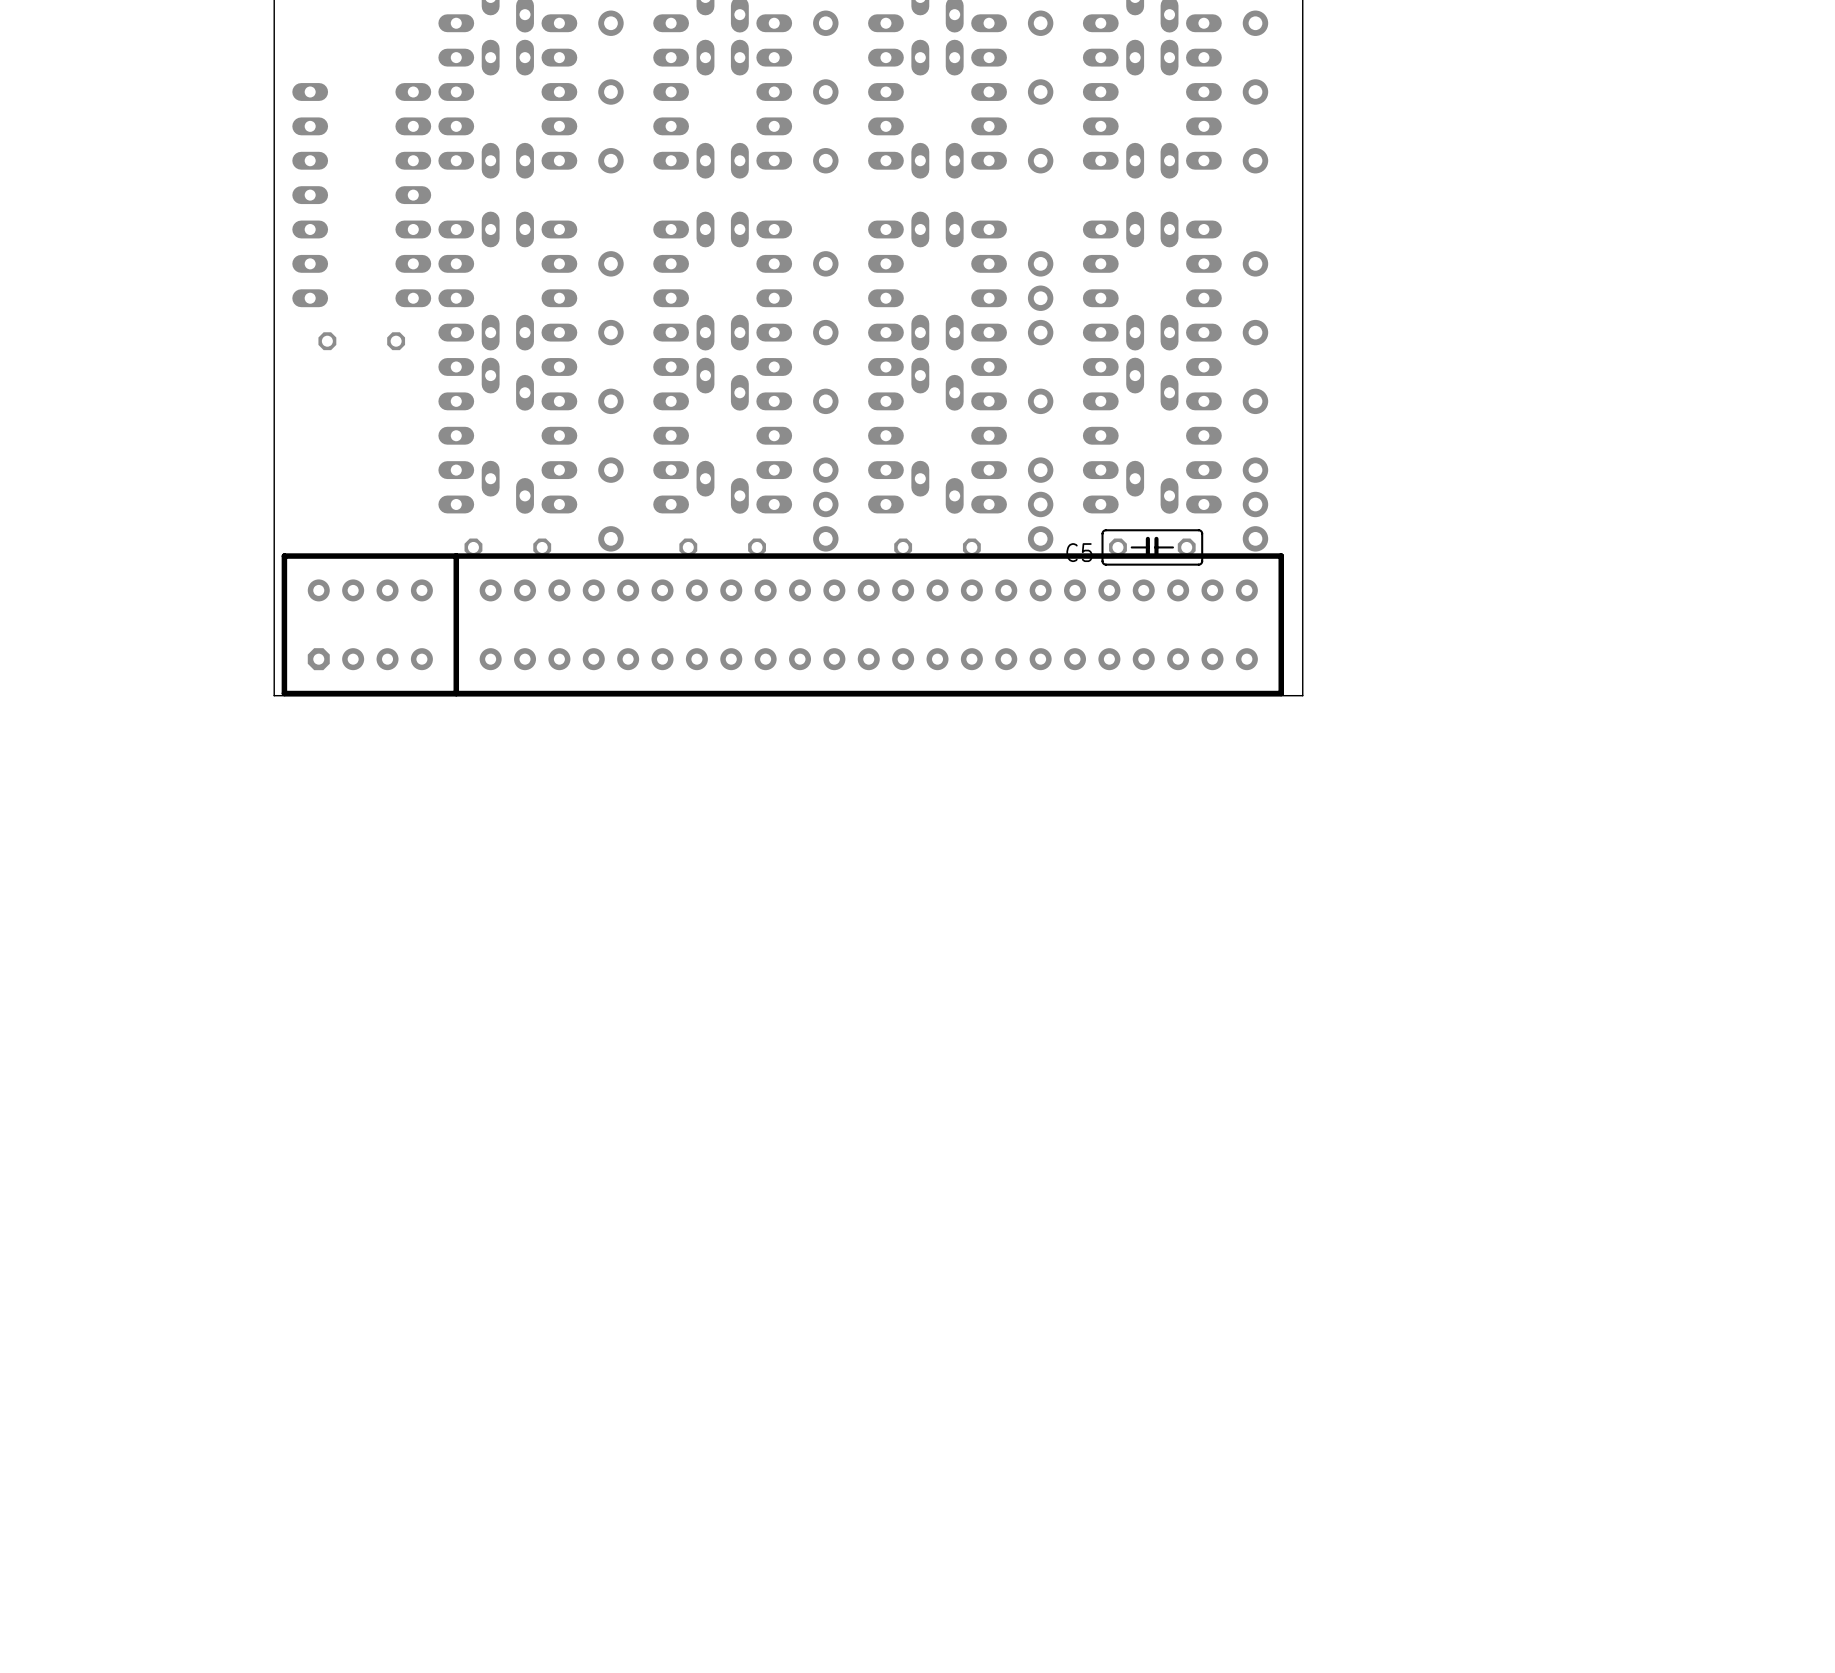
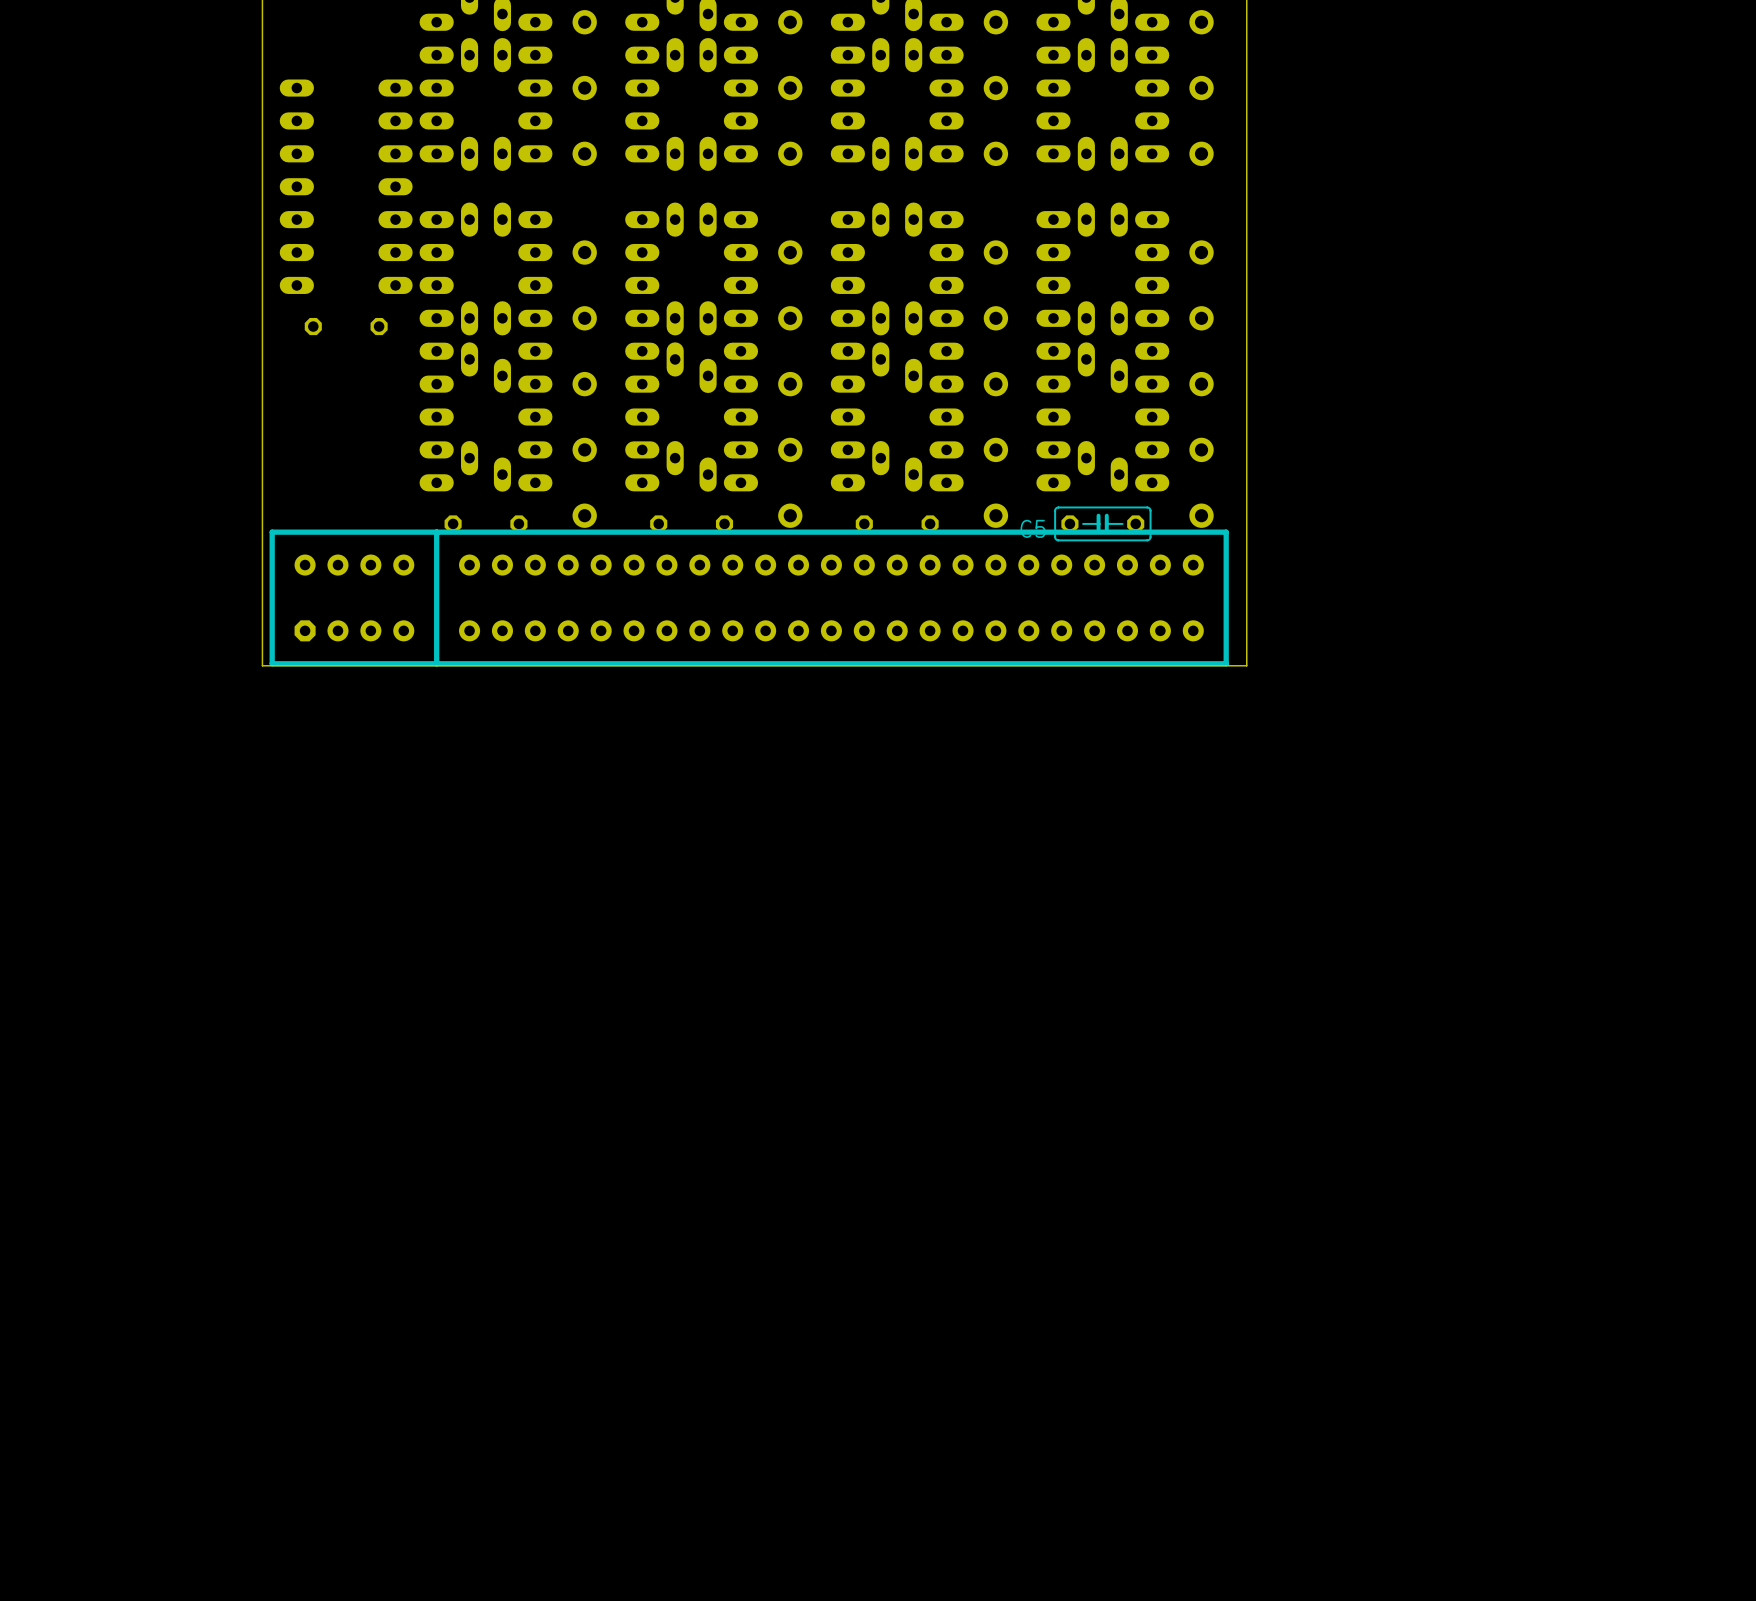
part: (1040, 298) -> none
part: (825, 504) -> none
part: (1040, 504) -> none
part: (1255, 504) -> none

